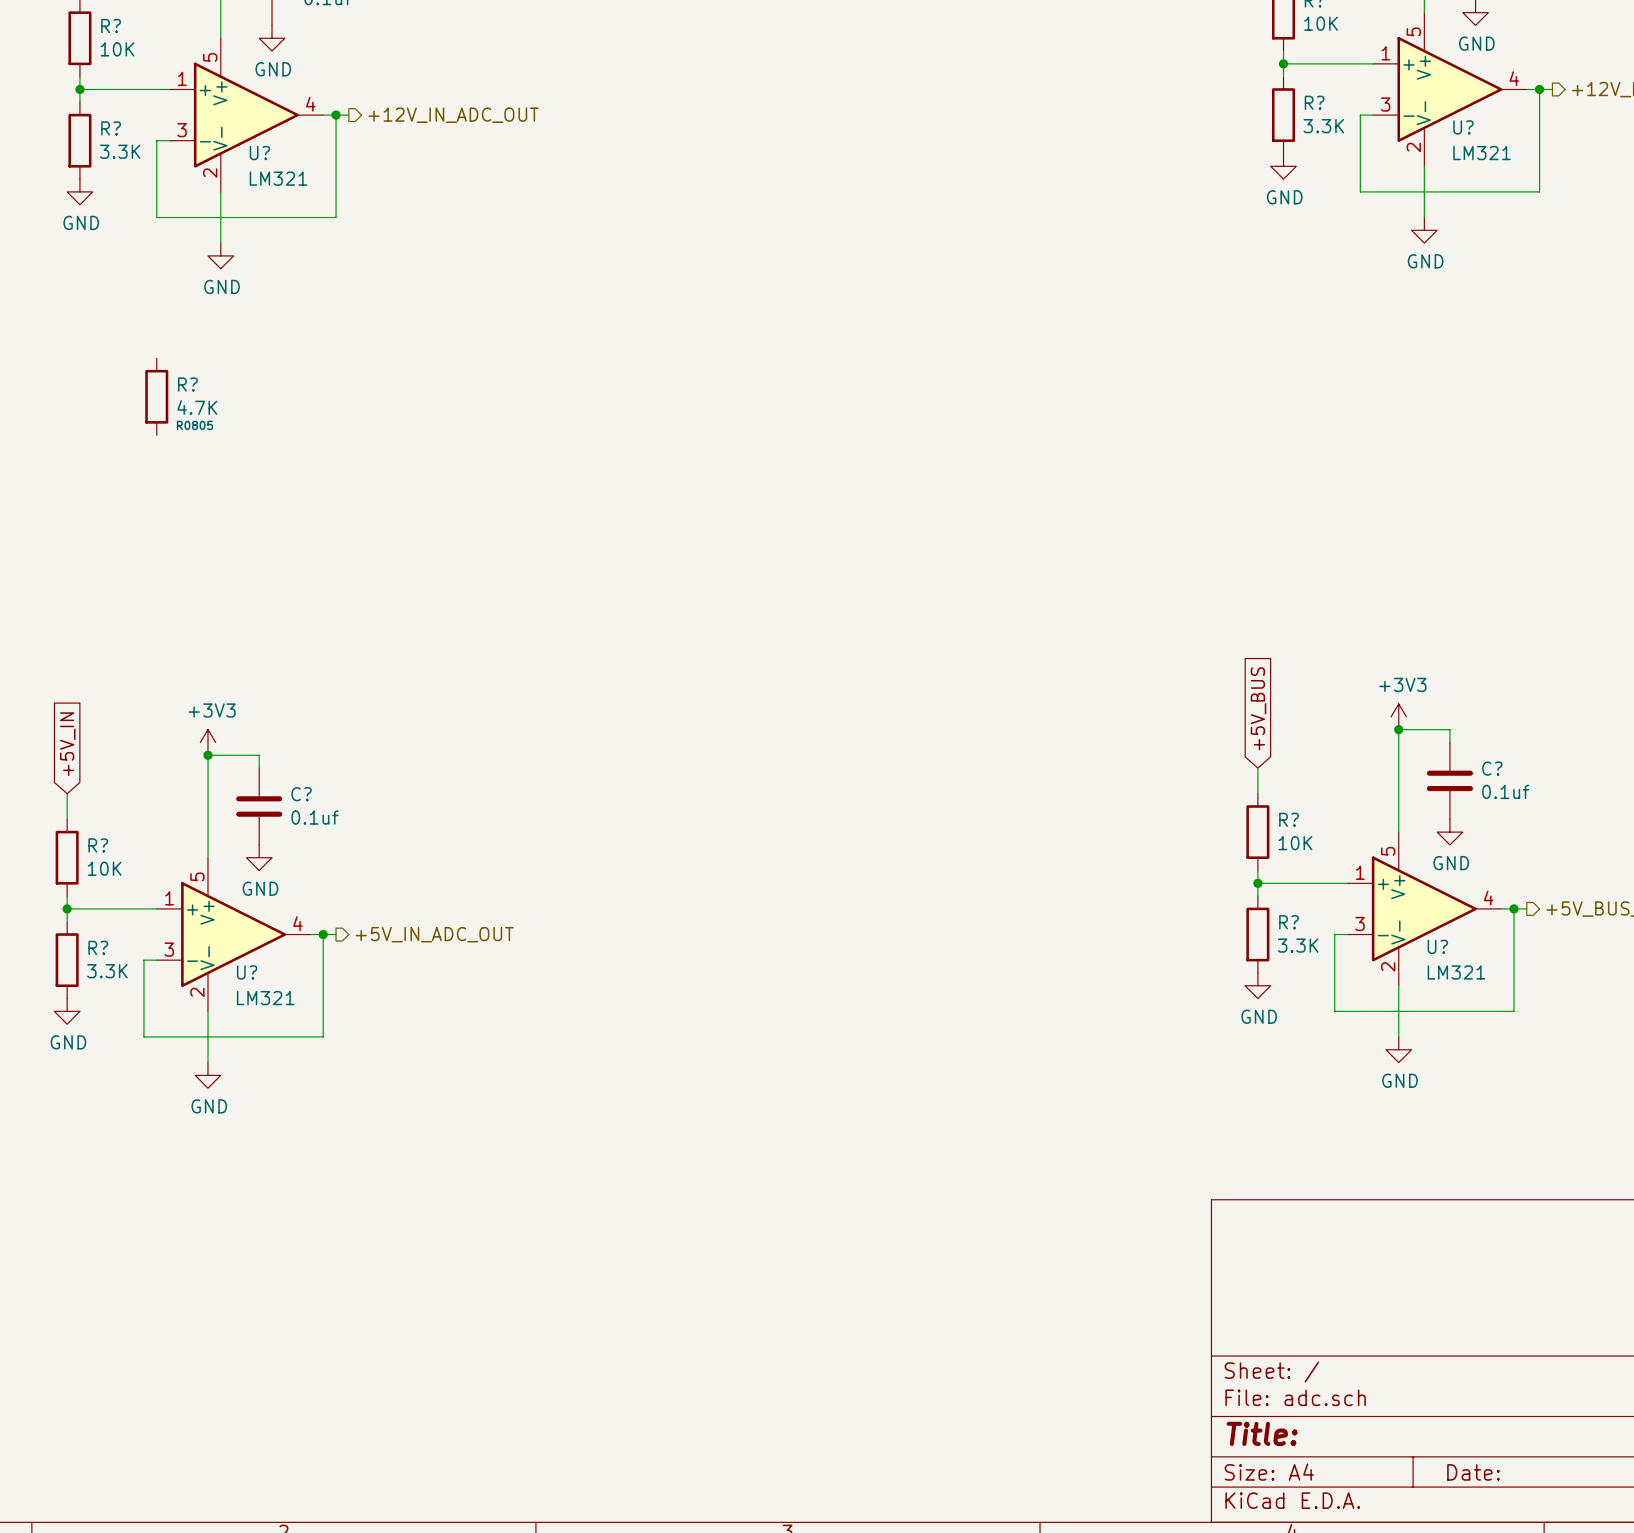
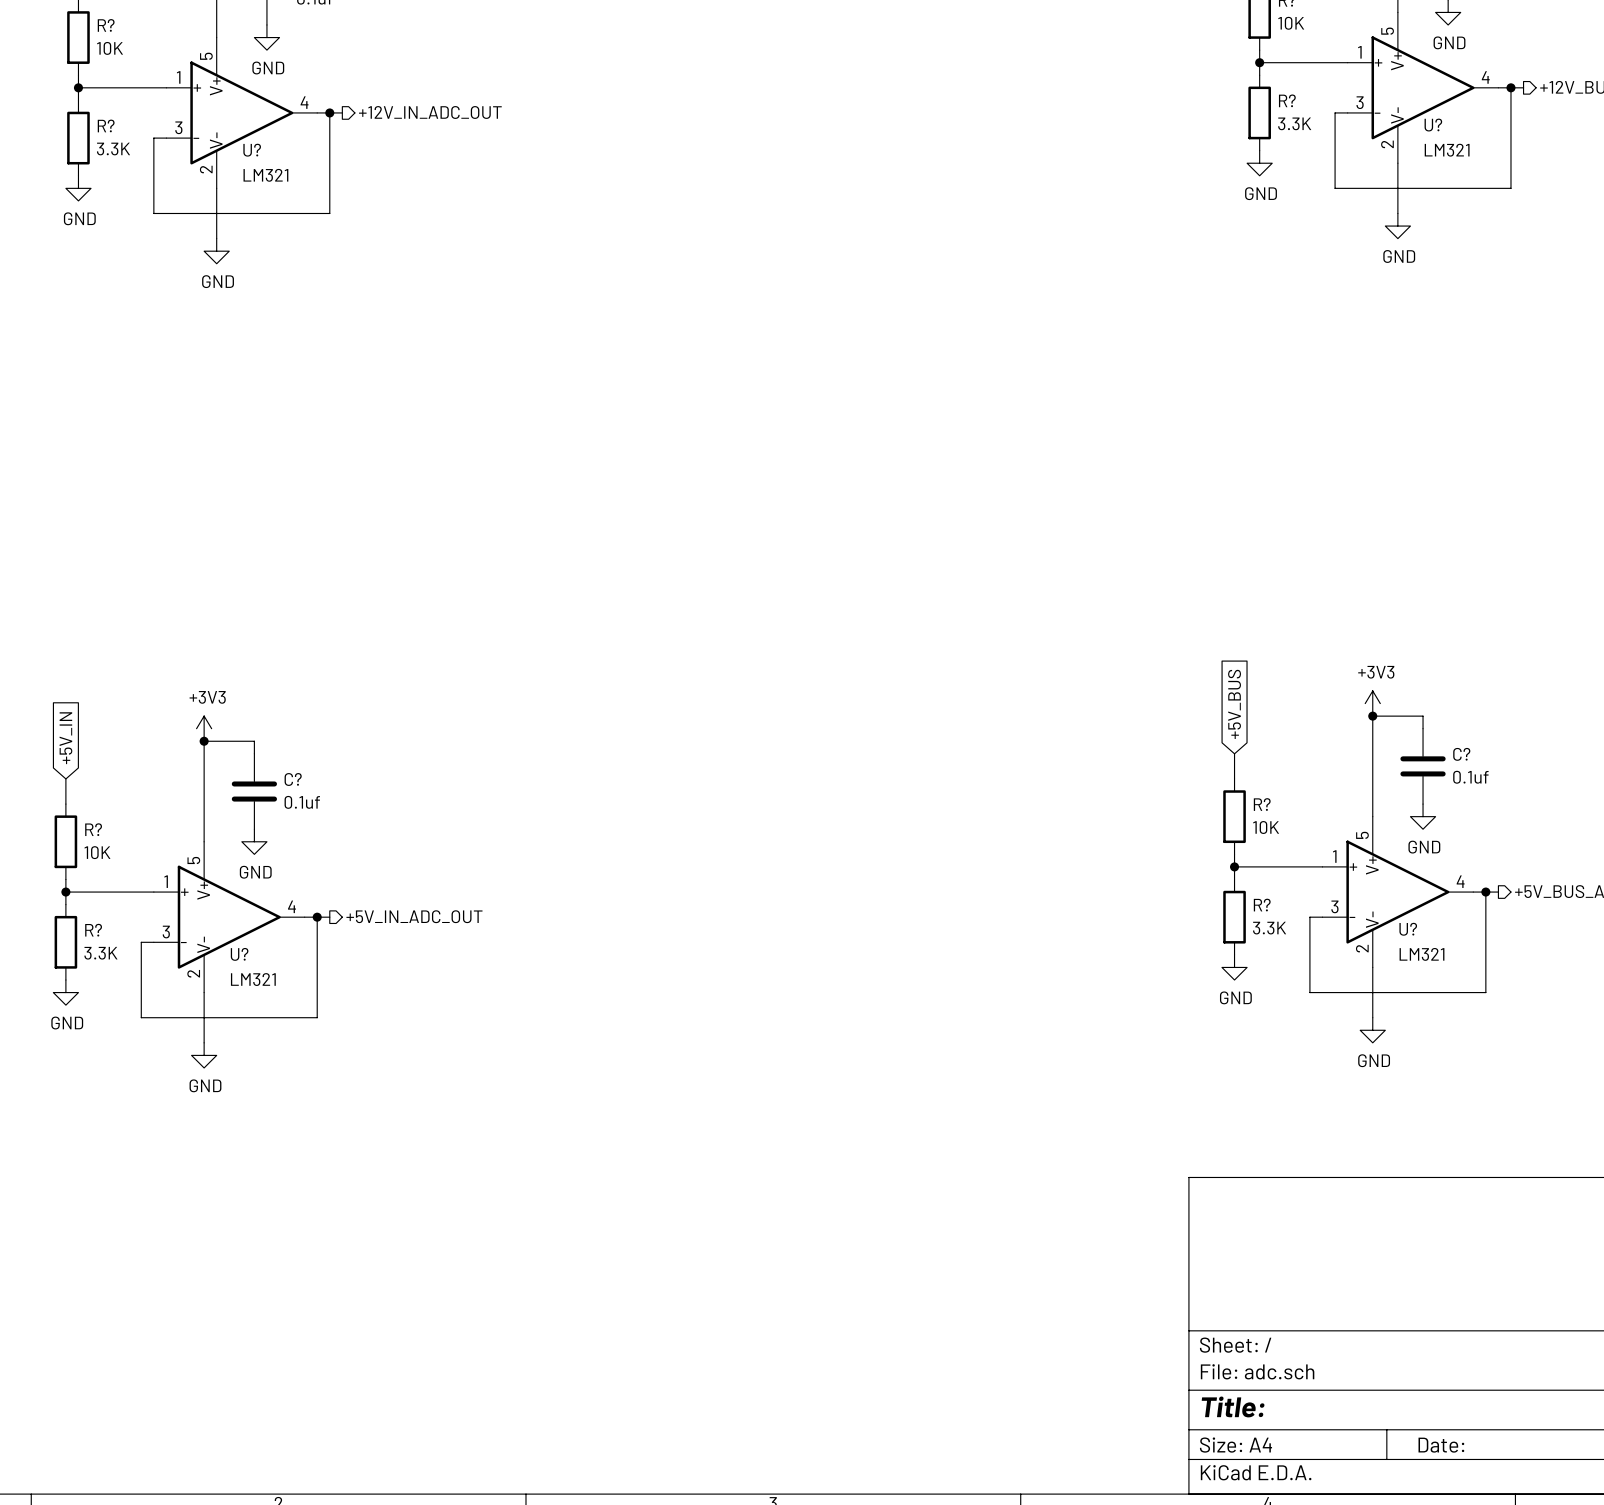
R?: 4.7K (156, 396) -> none

